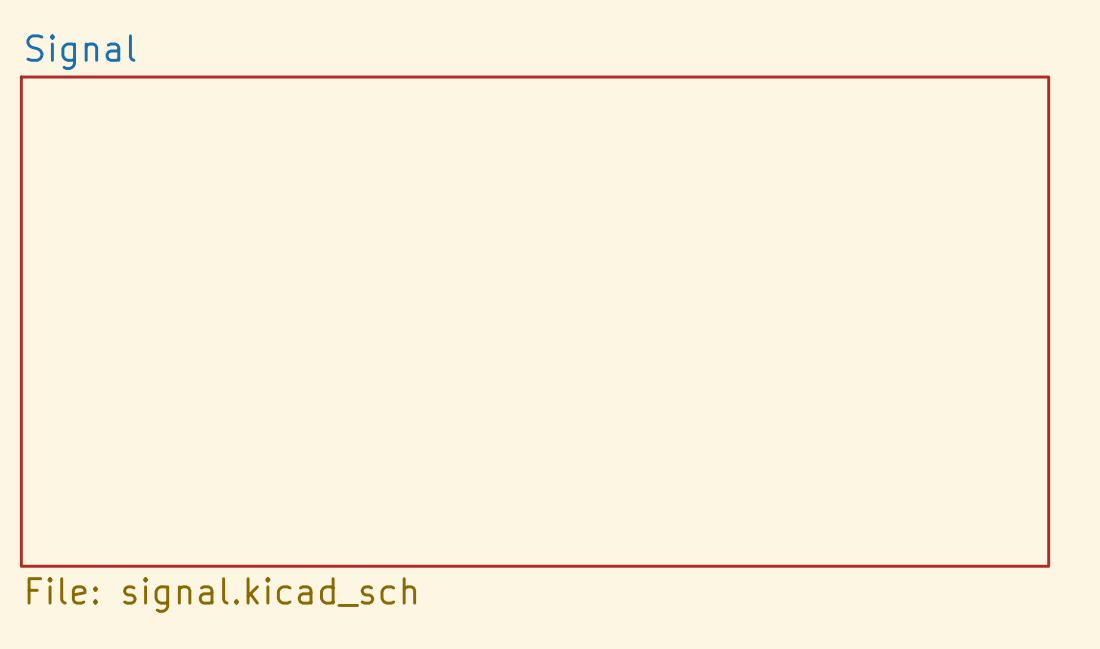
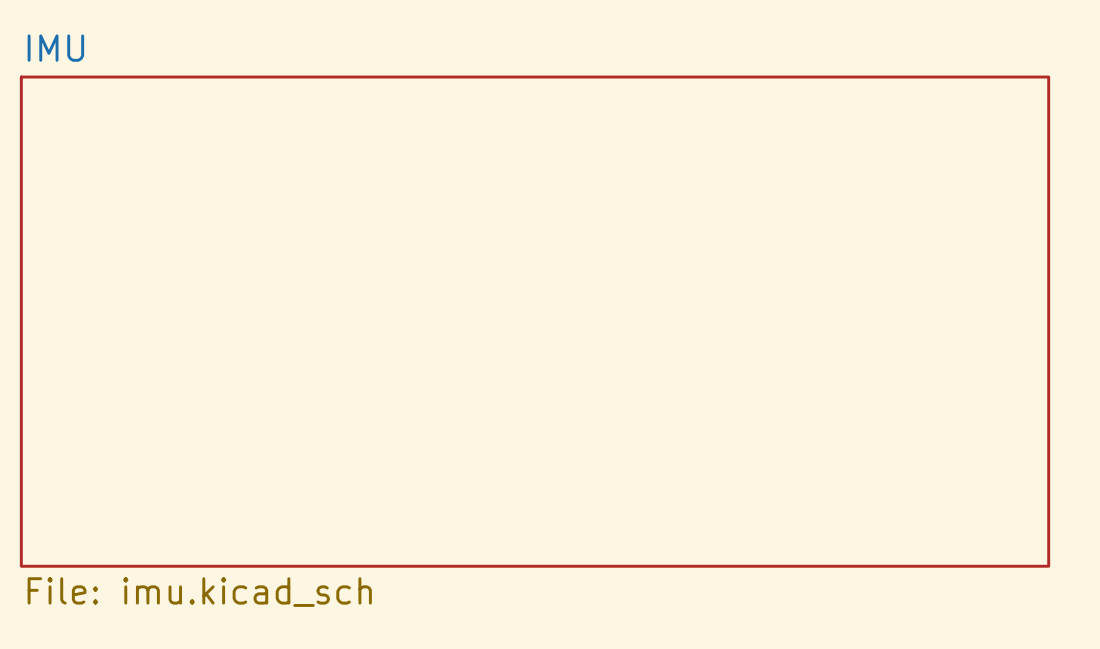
sheet Signal name: Signal (80, 52) -> IMU (55, 48)
sheet Signal value: File: signal.kicad_sch (221, 594) -> File: imu.kicad_sch (199, 592)

